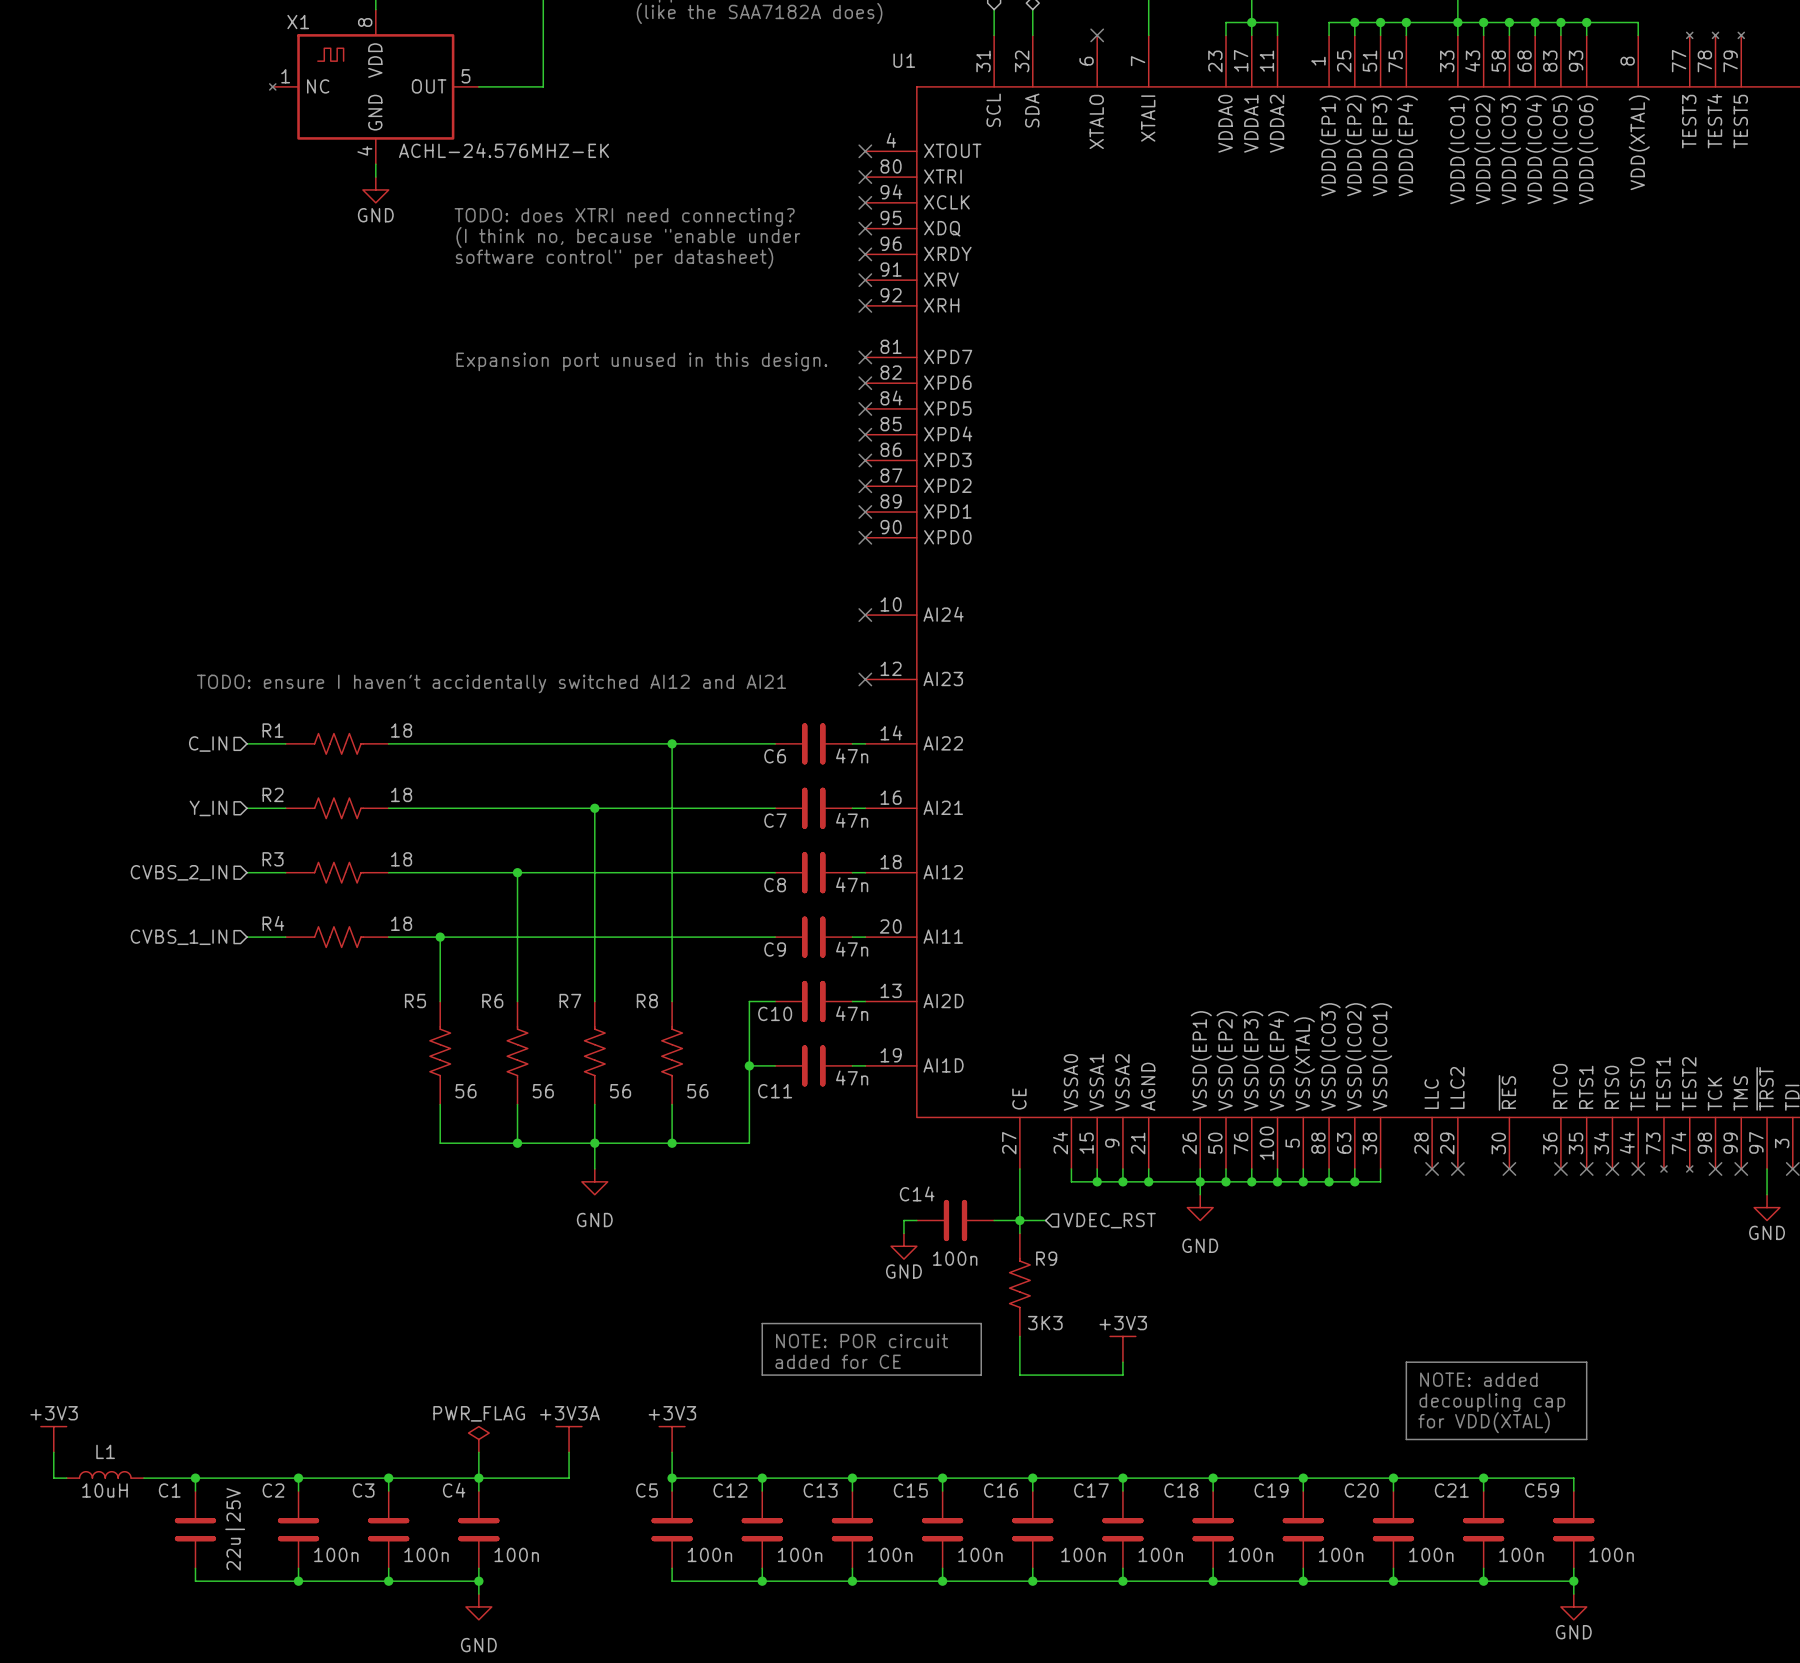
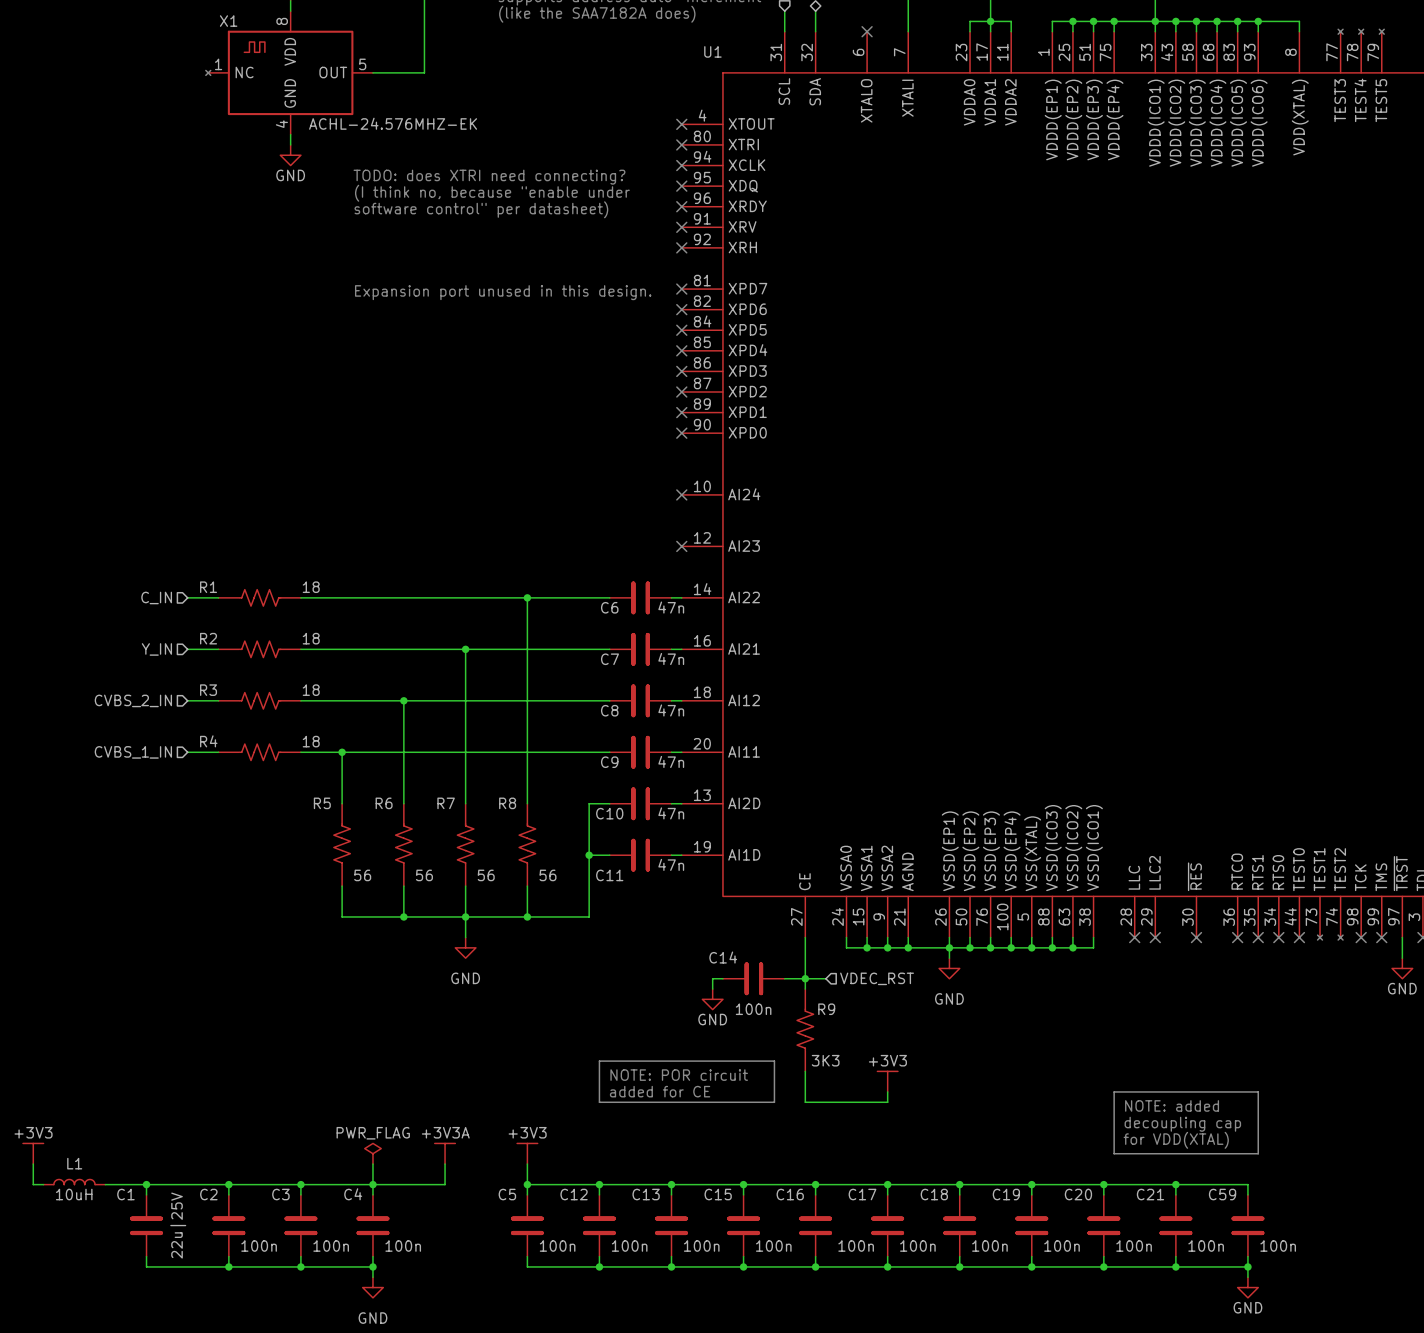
text: TODO: ensure I haven't accidentally switched AI12 and AI21 (491, 683) -> none

